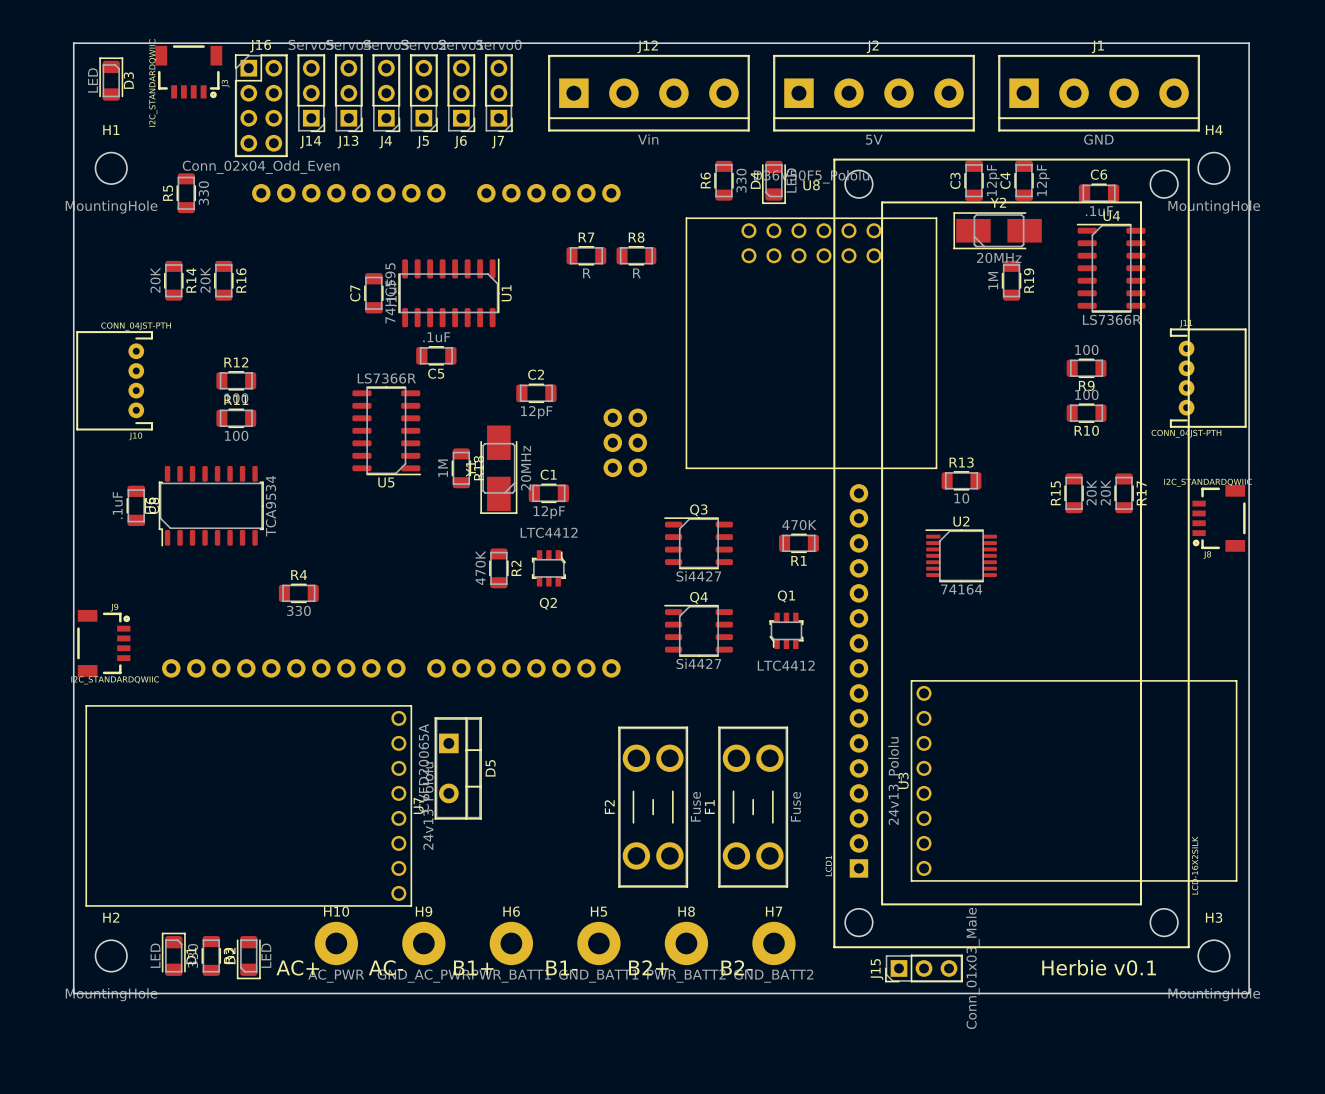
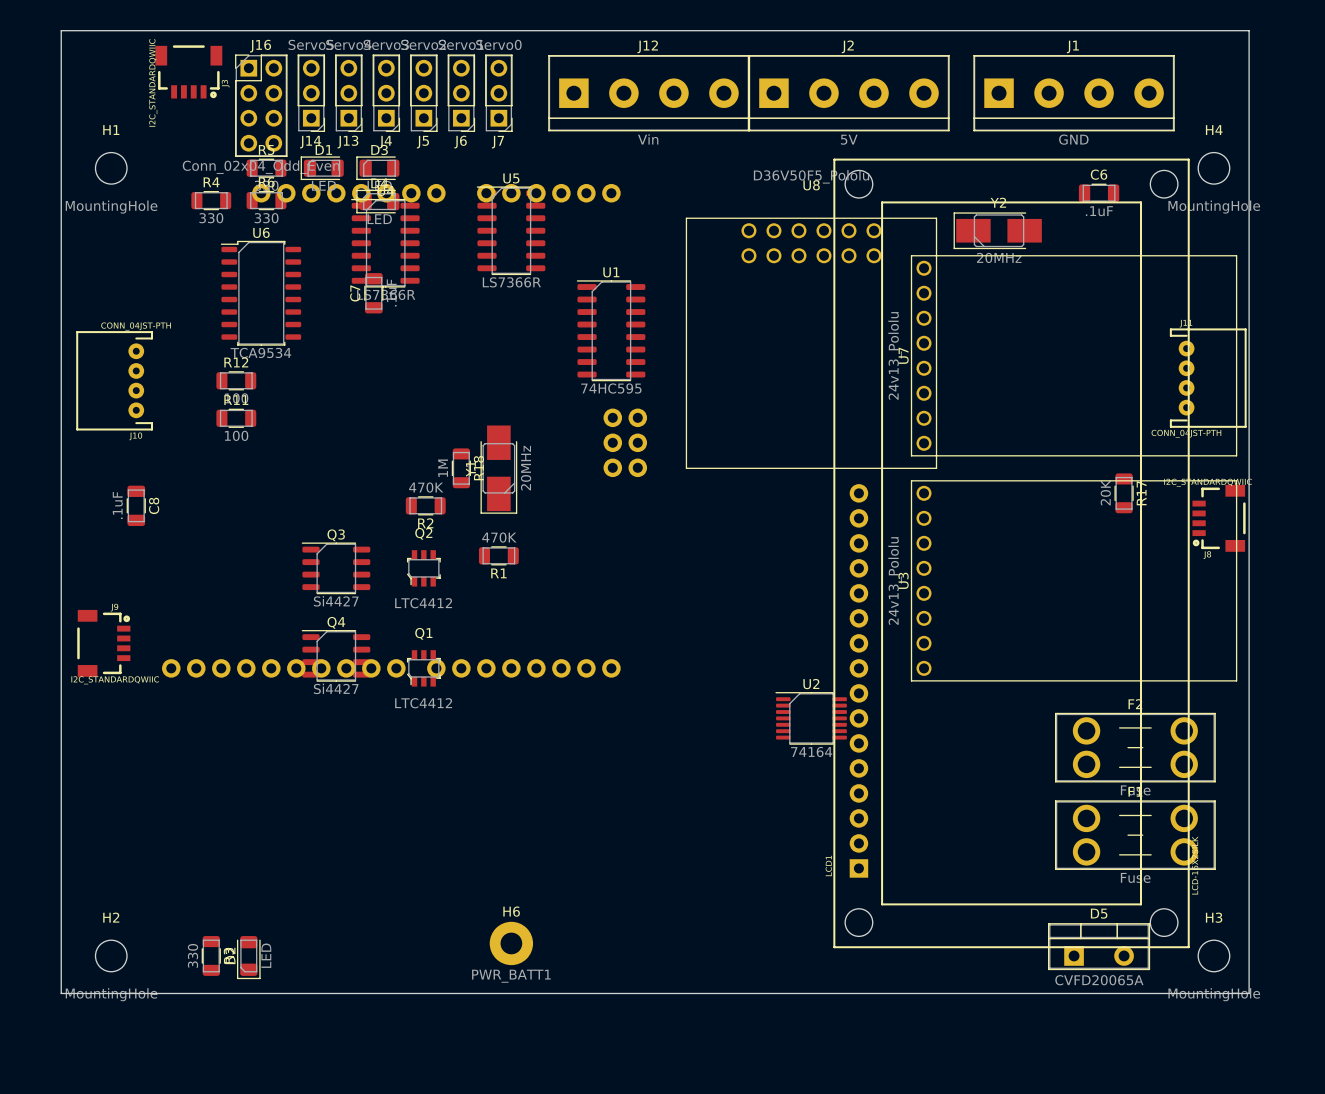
board edge: (1249, 43) (73, 43) (73, 993) -> (1249, 43) (1249, 30) (61, 30) (61, 993) (73, 993)
D3 rotation: 0° (111, 79) -> 90° counterclockwise (377, 168)
D3 position: (111, 79) -> (377, 168)
J2 position: (873, 93) -> (848, 93)
J1 position: (1099, 93) -> (1074, 93)
R6 rotation: 0° (723, 180) -> 90° clockwise (266, 200)
R6 position: (723, 180) -> (266, 200)
C3: 12pF (974, 180) -> none
C4: 12pF (1024, 180) -> none
D4 rotation: 0° (773, 182) -> 90° clockwise (377, 201)
D4 position: (773, 182) -> (377, 201)
R5 rotation: 0° (186, 193) -> 90° clockwise (266, 168)
R5 position: (186, 193) -> (266, 168)
R7: R (586, 255) -> none
R8: R (636, 255) -> none
U4 position: (1111, 268) -> (385, 243)
R14: 20K (173, 280) -> none
R16: 20K (223, 280) -> none
R19: 1M (1011, 280) -> none
U1 rotation: 0° (448, 292) -> 90° counterclockwise (611, 330)
U1 position: (448, 292) -> (611, 330)
C5: .1uF (436, 355) -> none
R9: 100 (1086, 368) -> none
C2: 12pF (536, 393) -> none
R10: 100 (1086, 413) -> none
U5 rotation: 0° (386, 430) -> 180° (511, 230)
U5 position: (386, 430) -> (511, 230)
R13: 10 (961, 480) -> none
C1: 12pF (548, 493) -> none
R15: 20K (1074, 493) -> none
U6 rotation: 0° (211, 506) -> 90° clockwise (261, 293)
U6 position: (211, 506) -> (261, 293)
Q3 position: (698, 543) -> (336, 568)
R1 position: (798, 543) -> (498, 555)
U2 position: (961, 555) -> (811, 718)
R2 rotation: 0° (498, 568) -> 90° clockwise (425, 505)
R2 position: (498, 568) -> (425, 505)
Q2 rotation: 0° (548, 568) -> 180° (423, 568)
Q2 position: (548, 568) -> (423, 568)
R4 position: (298, 593) -> (211, 200)
Q4 position: (698, 630) -> (336, 655)
Q1 position: (786, 630) -> (423, 668)
D5 rotation: 0° (458, 768) -> 90° counterclockwise (1099, 946)
D5 position: (458, 768) -> (1099, 946)
U3 position: (1074, 780) -> (1074, 580)
U7 rotation: 0° (248, 805) -> 180° (1074, 355)
U7 position: (248, 805) -> (1074, 355)
F2 rotation: 0° (653, 807) -> 90° clockwise (1135, 747)
F2 position: (653, 807) -> (1135, 747)
F1 rotation: 0° (753, 807) -> 90° clockwise (1135, 835)
F1 position: (753, 807) -> (1135, 835)
H10: AC_PWR (336, 943) -> none
H9: GND_AC_PWR (423, 943) -> none
H5: GND_BATT1 (598, 943) -> none
H8: PWR_BATT2 (686, 943) -> none
H7: GND_BATT2 (773, 943) -> none
D1 rotation: 0° (173, 954) -> 90° counterclockwise (322, 168)
D1 position: (173, 954) -> (322, 168)
text: AC+ (297, 967) -> none
text: AC- (385, 967) -> none
text: B1+ (473, 967) -> none
text: B1- (561, 967) -> none
text: B2+ (648, 967) -> none
text: B2- (736, 967) -> none
text: Herbie v0.1 (1099, 967) -> none
J15: Conn_01x03_Male (924, 968) -> none

